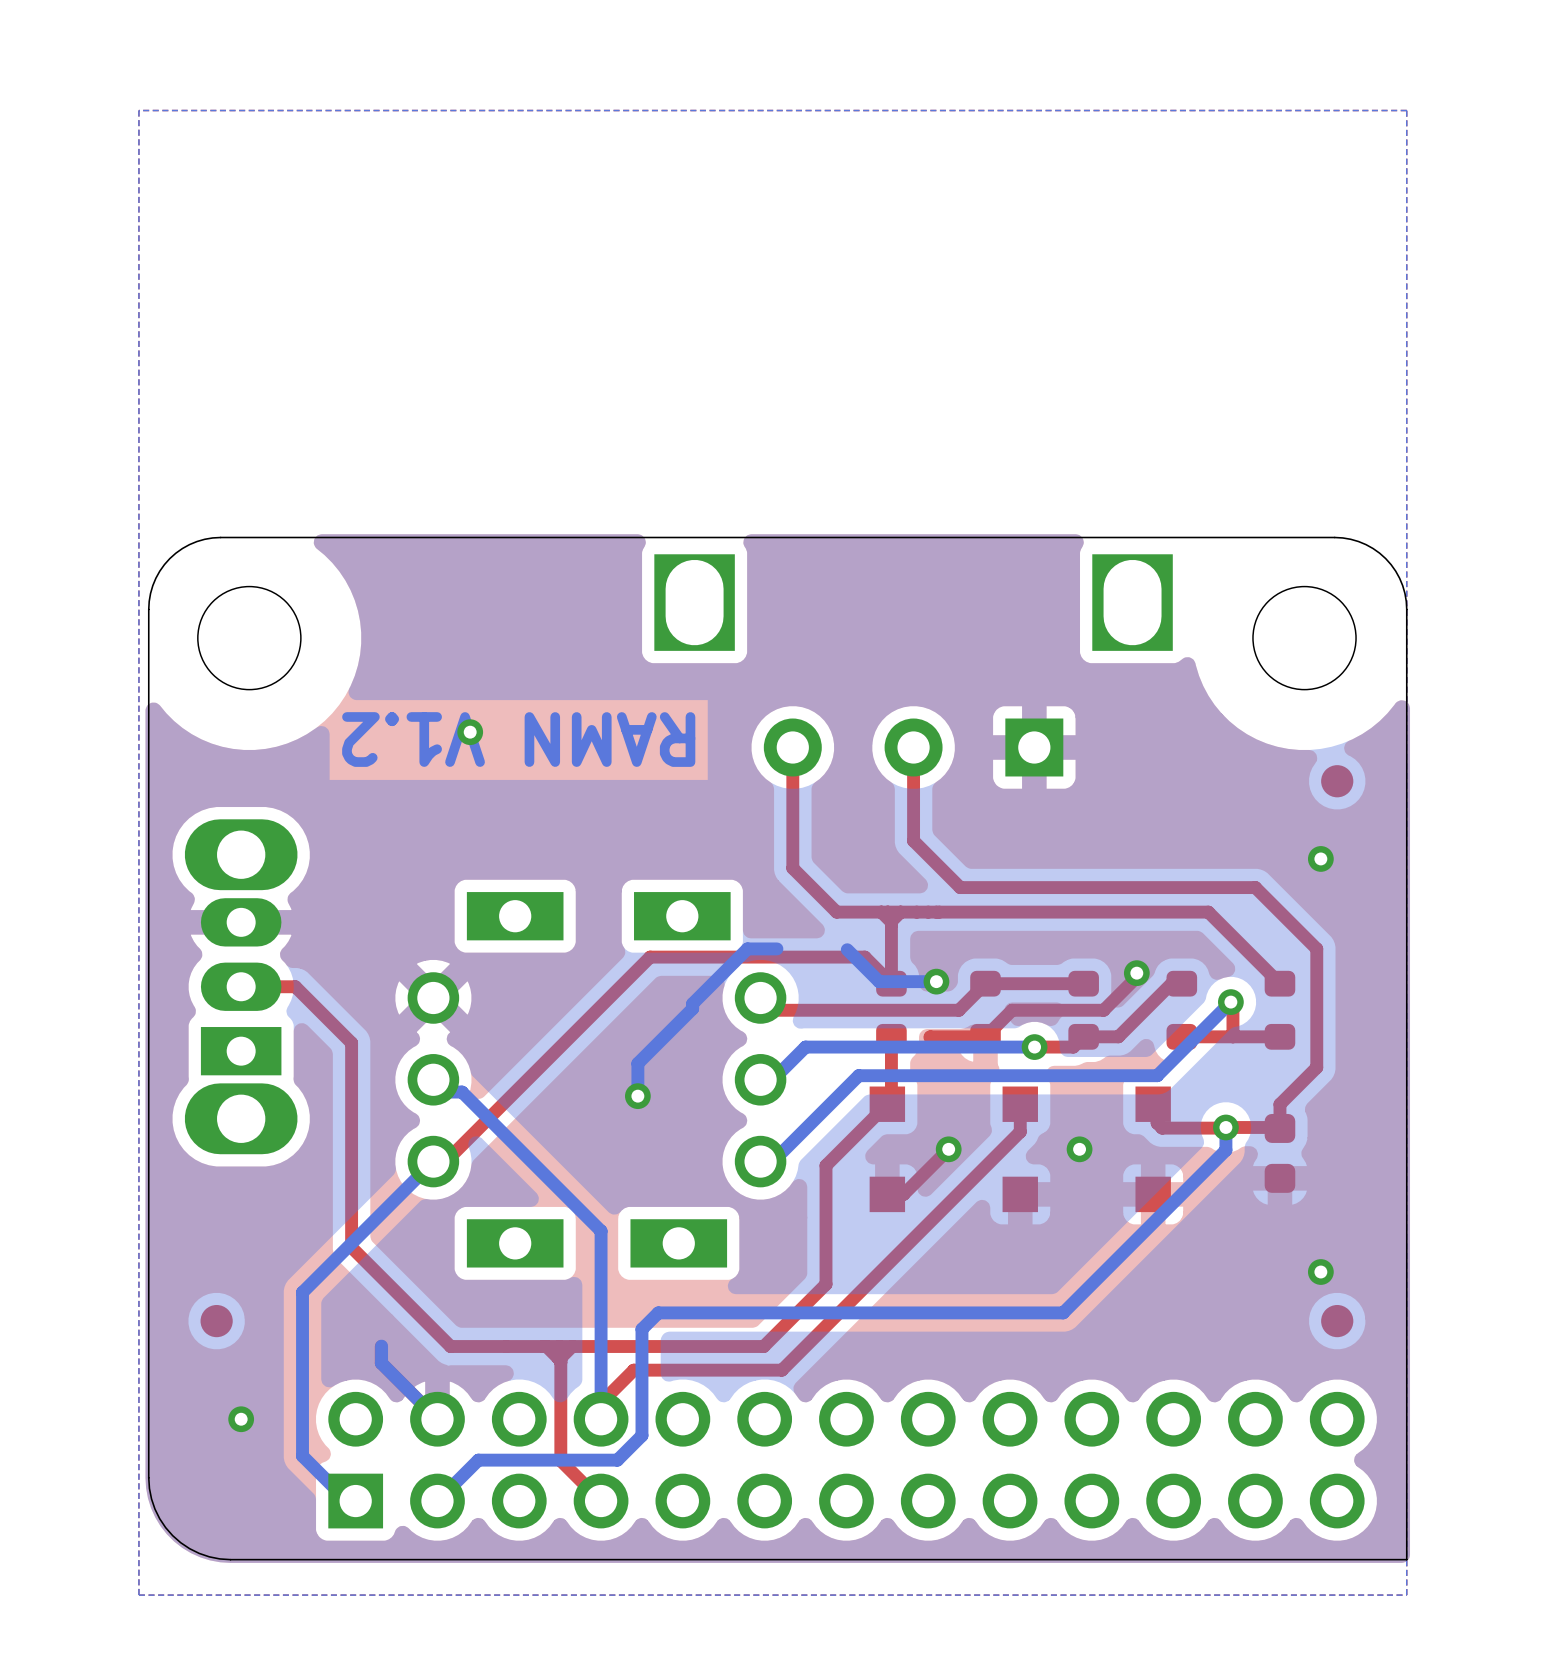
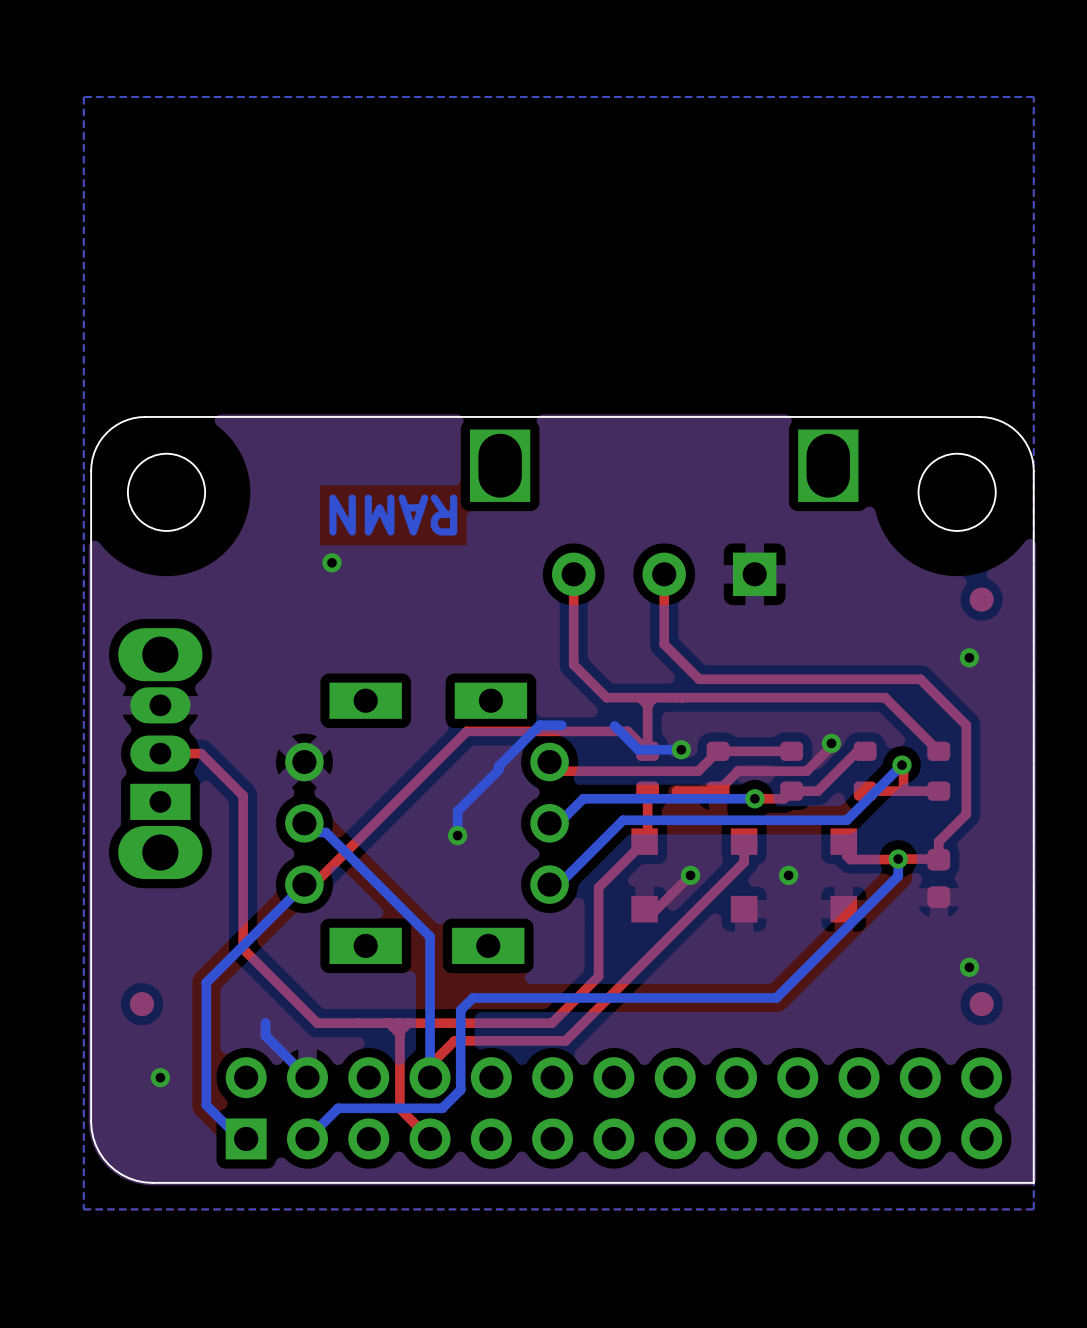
text: RAMN V1.2 (518, 739) -> RAMN (393, 515)

